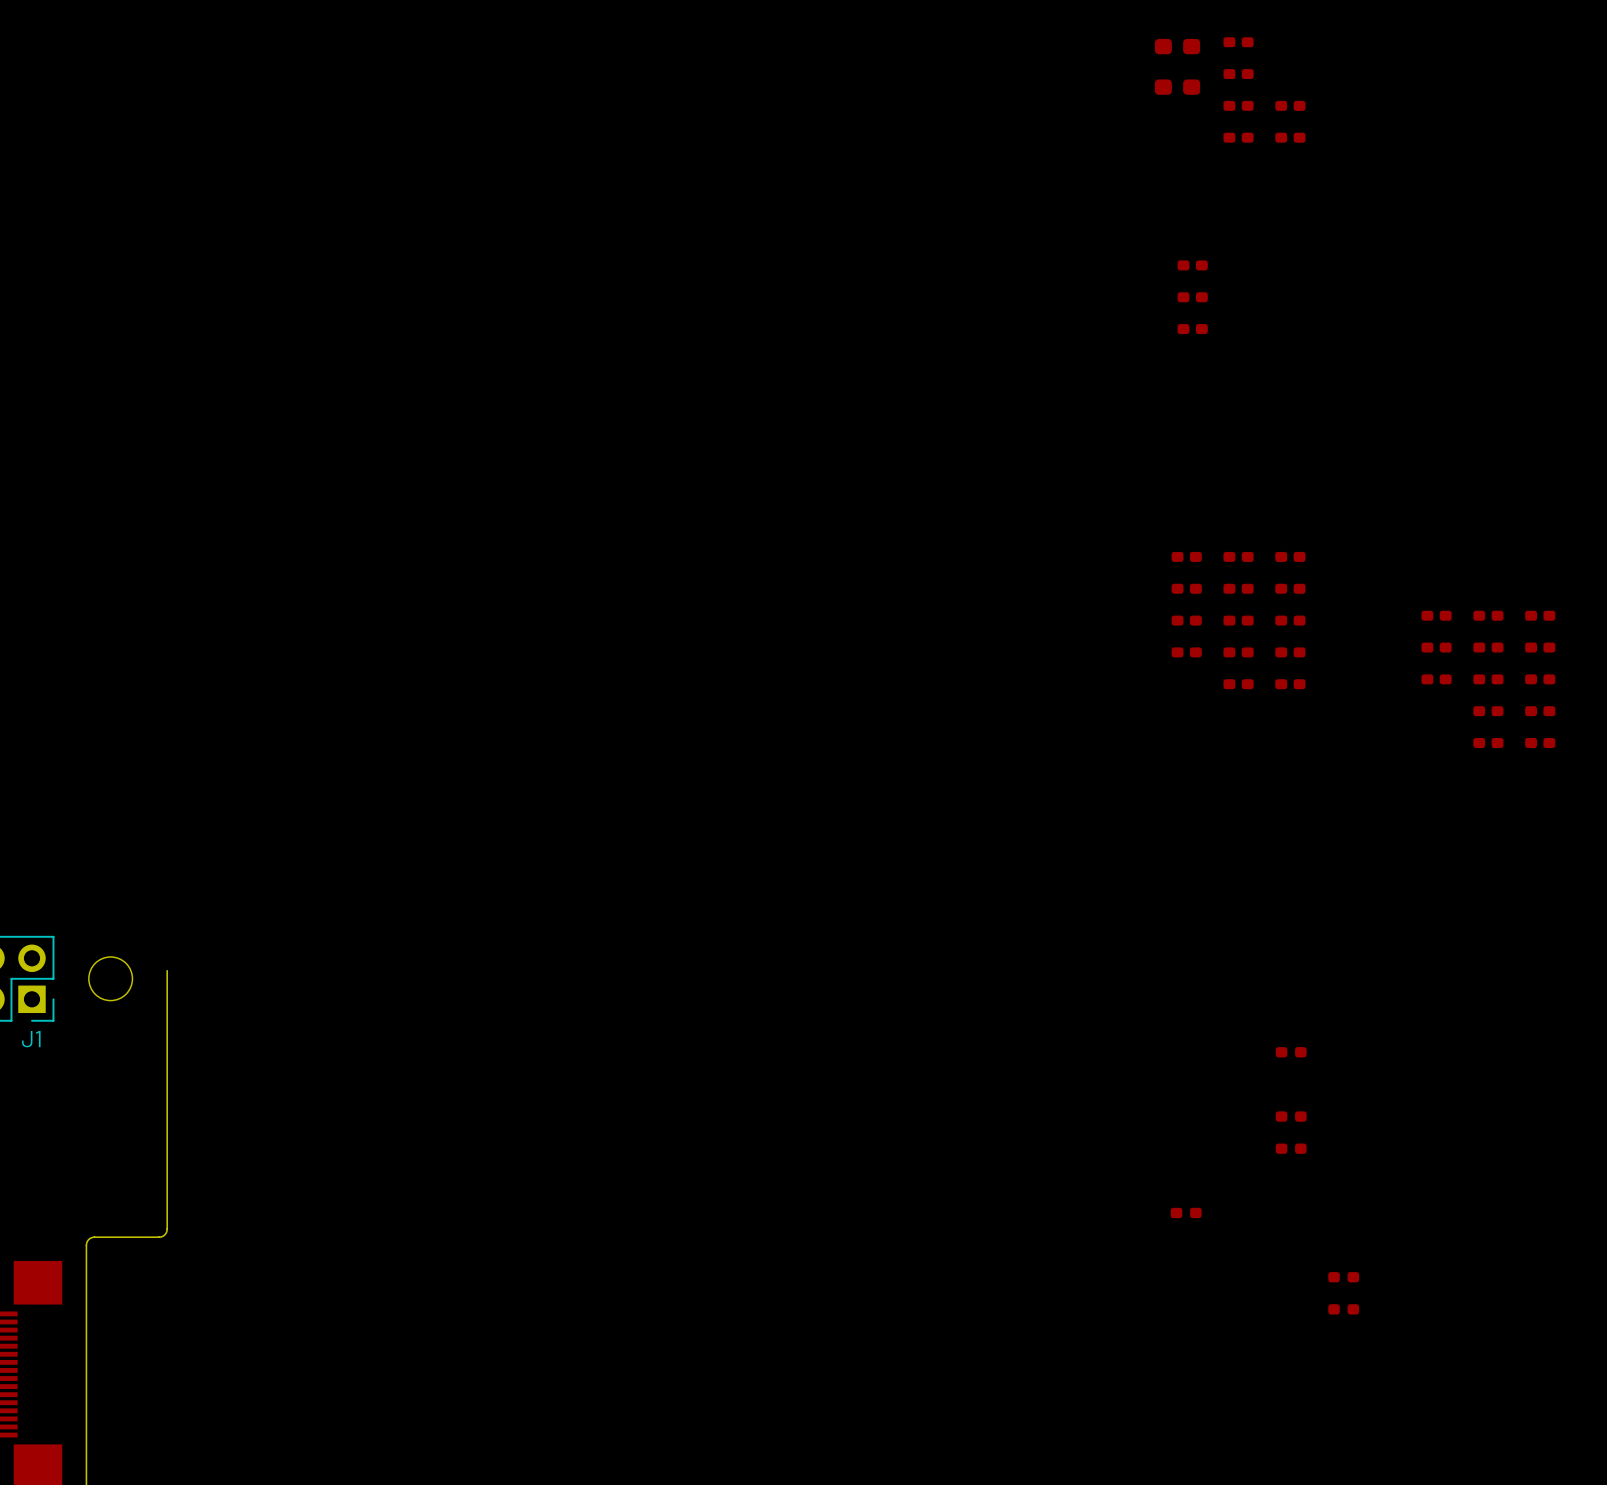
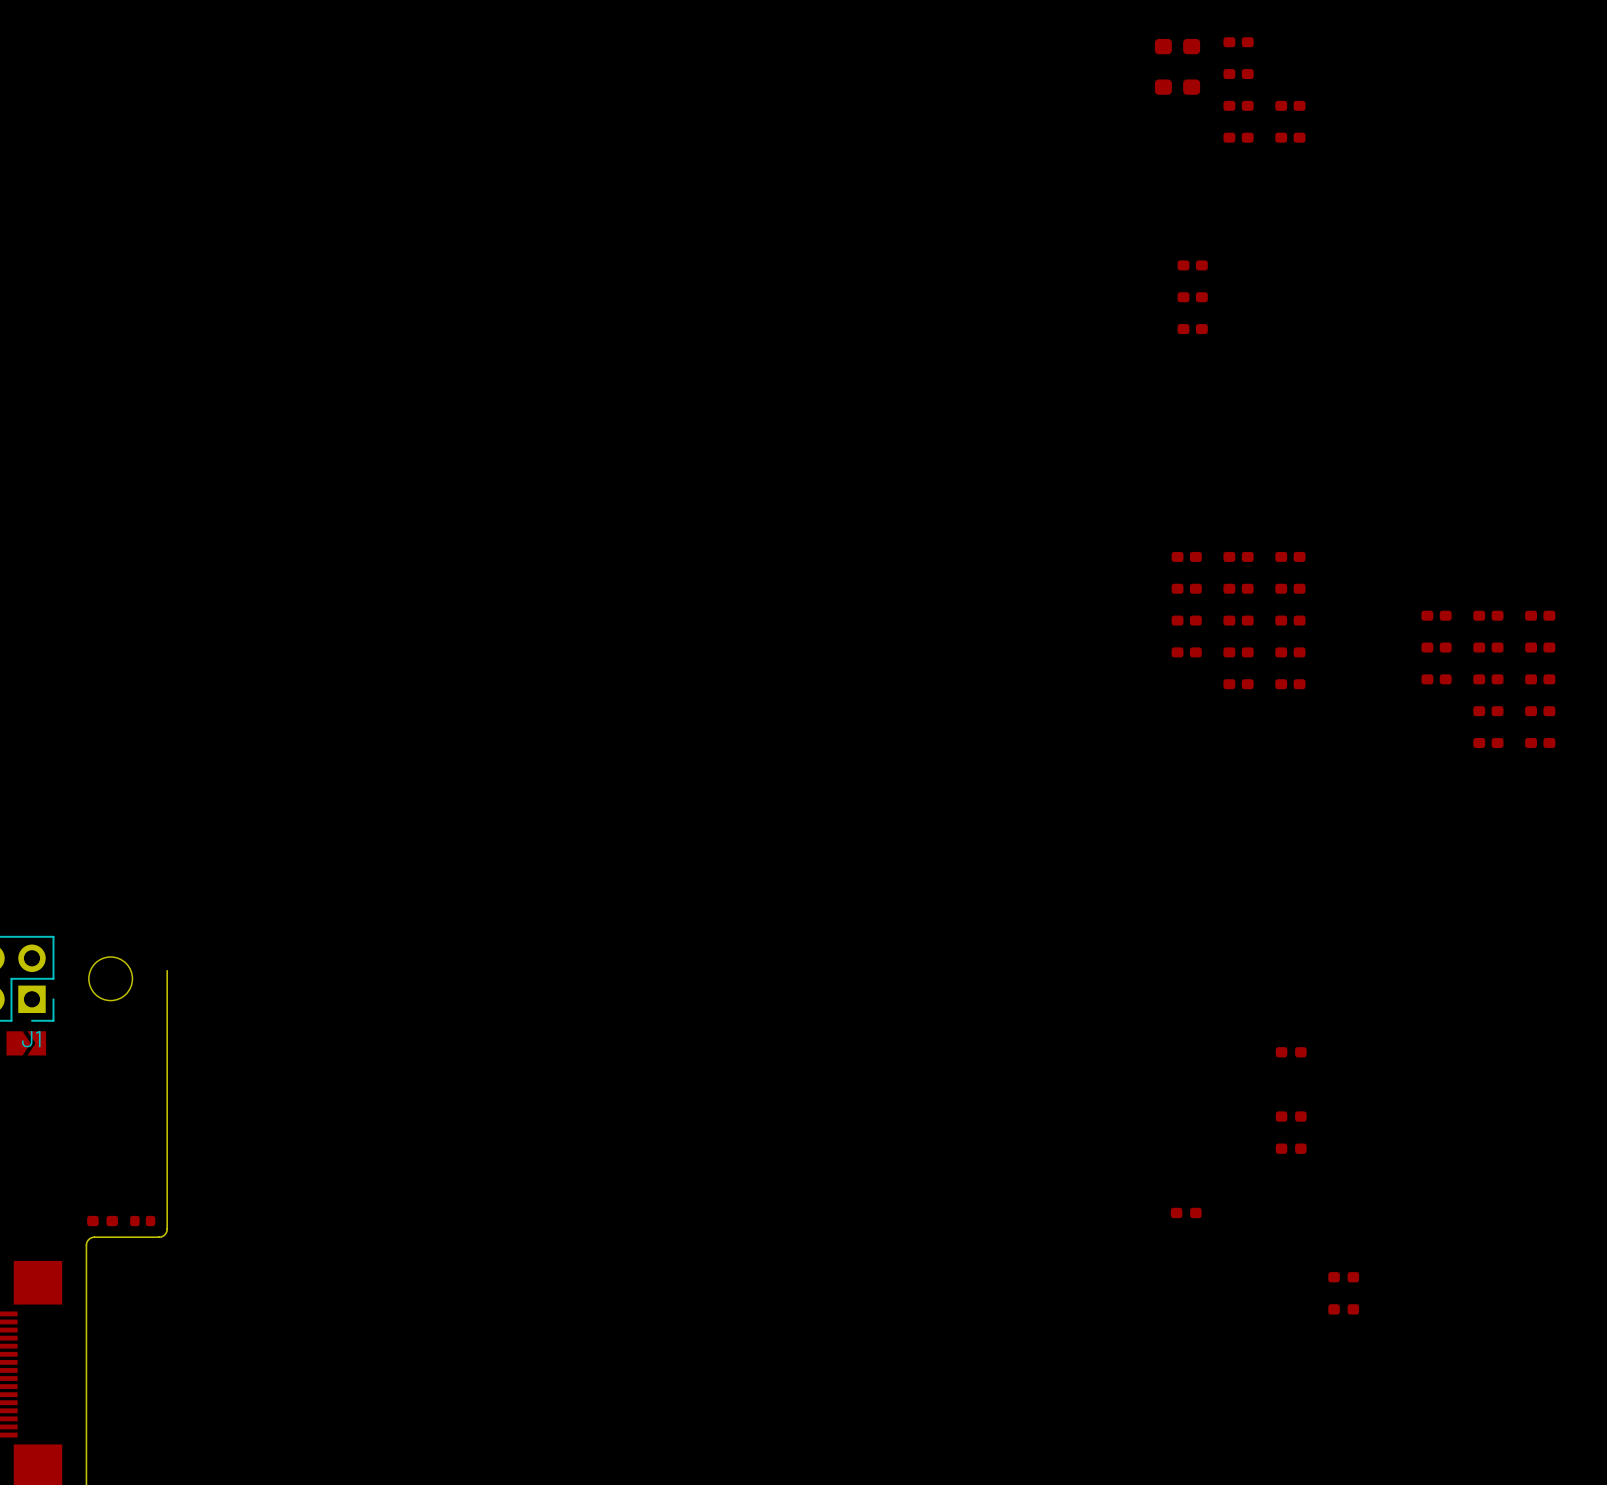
part: none -> (26, 1043)
part: none -> (102, 1221)
part: none -> (142, 1221)

